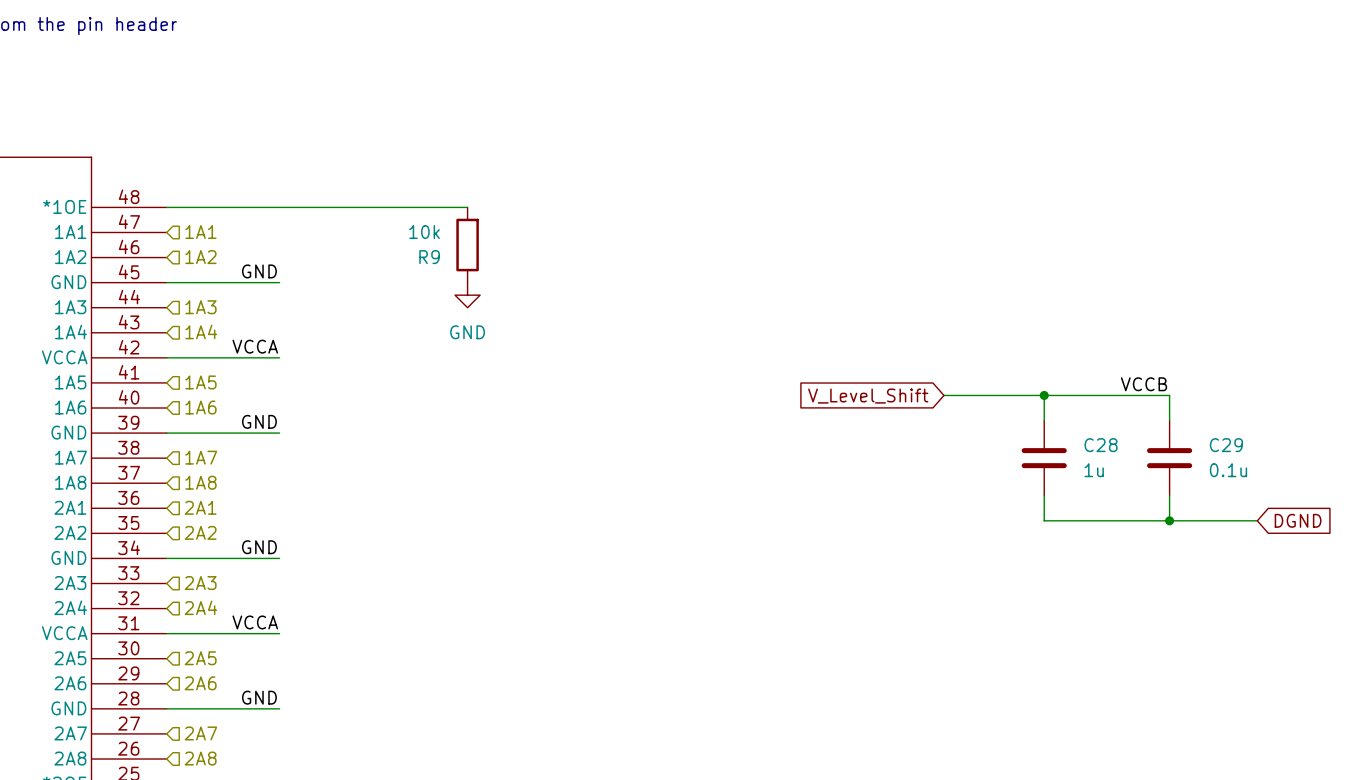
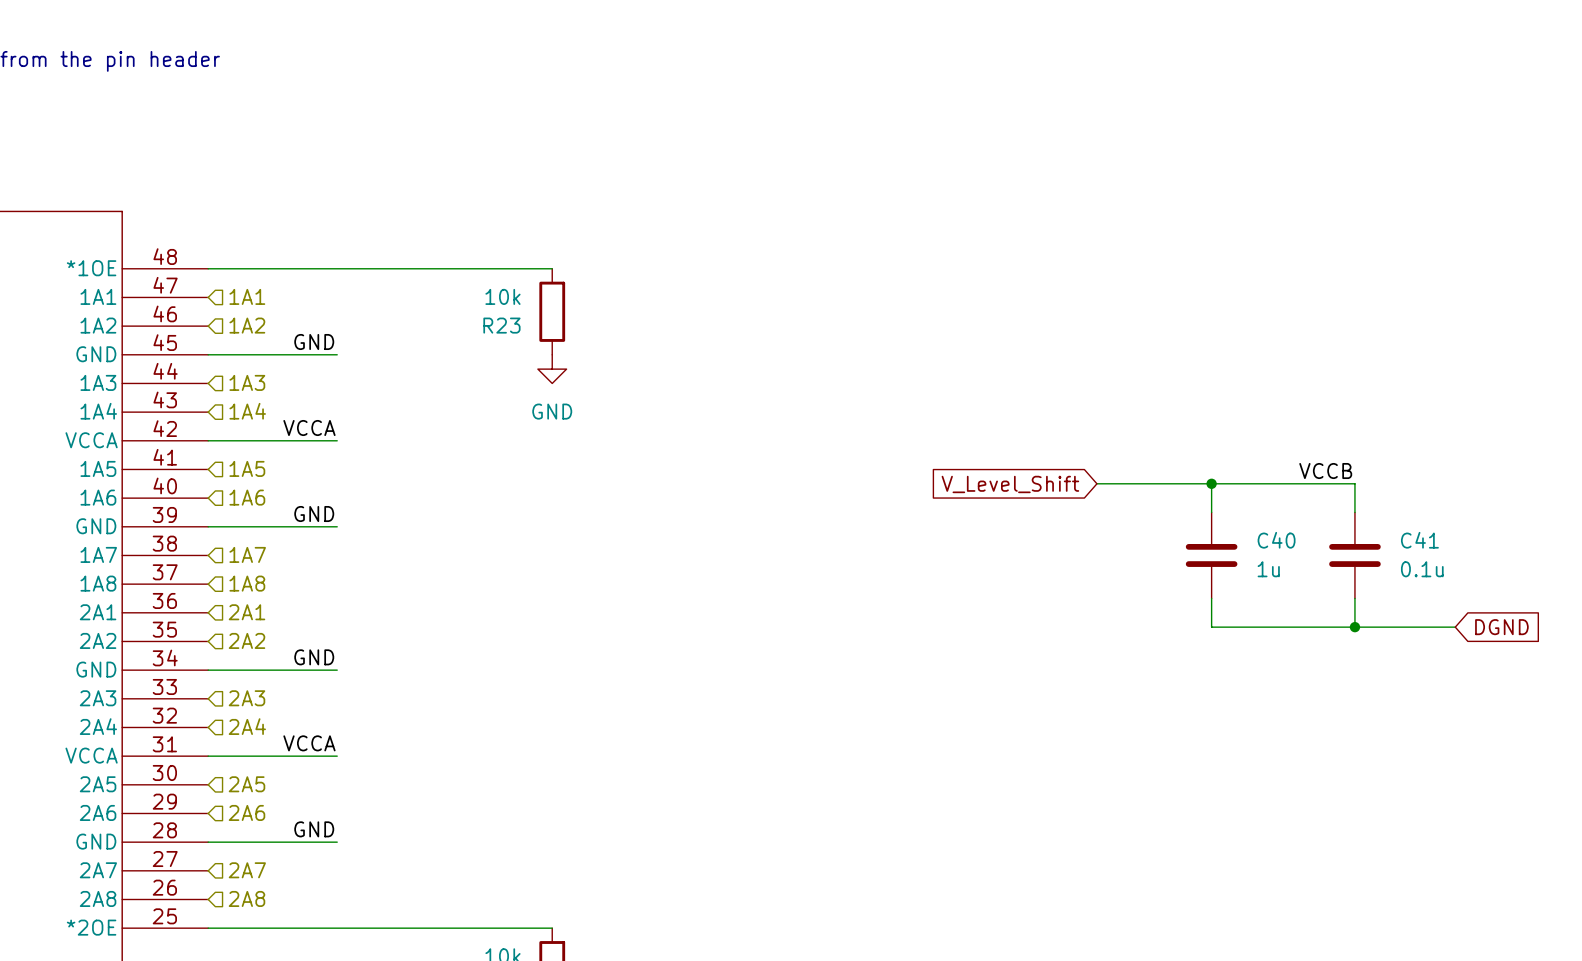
R9 name: R9 (429, 257) -> R23 (501, 325)
C28 name: C28 (1101, 445) -> C40 (1276, 540)
C29 name: C29 (1226, 445) -> C41 (1419, 540)

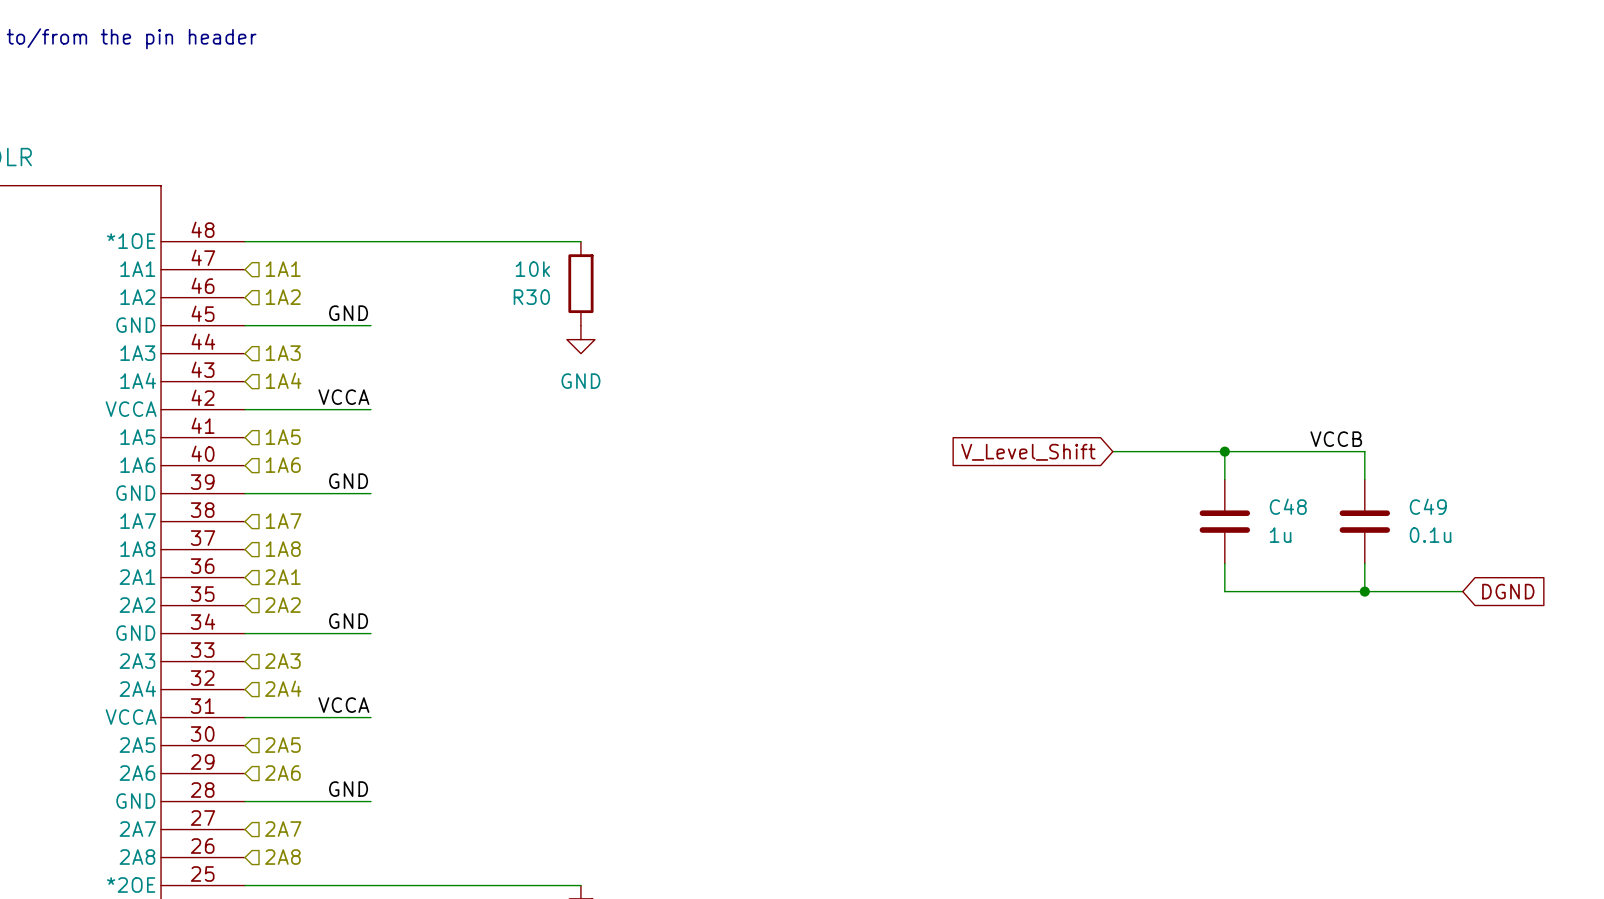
R23 name: R23 (501, 325) -> R30 (531, 297)
C40 name: C40 (1276, 540) -> C48 (1288, 506)
C41 name: C41 (1419, 540) -> C49 (1428, 506)

